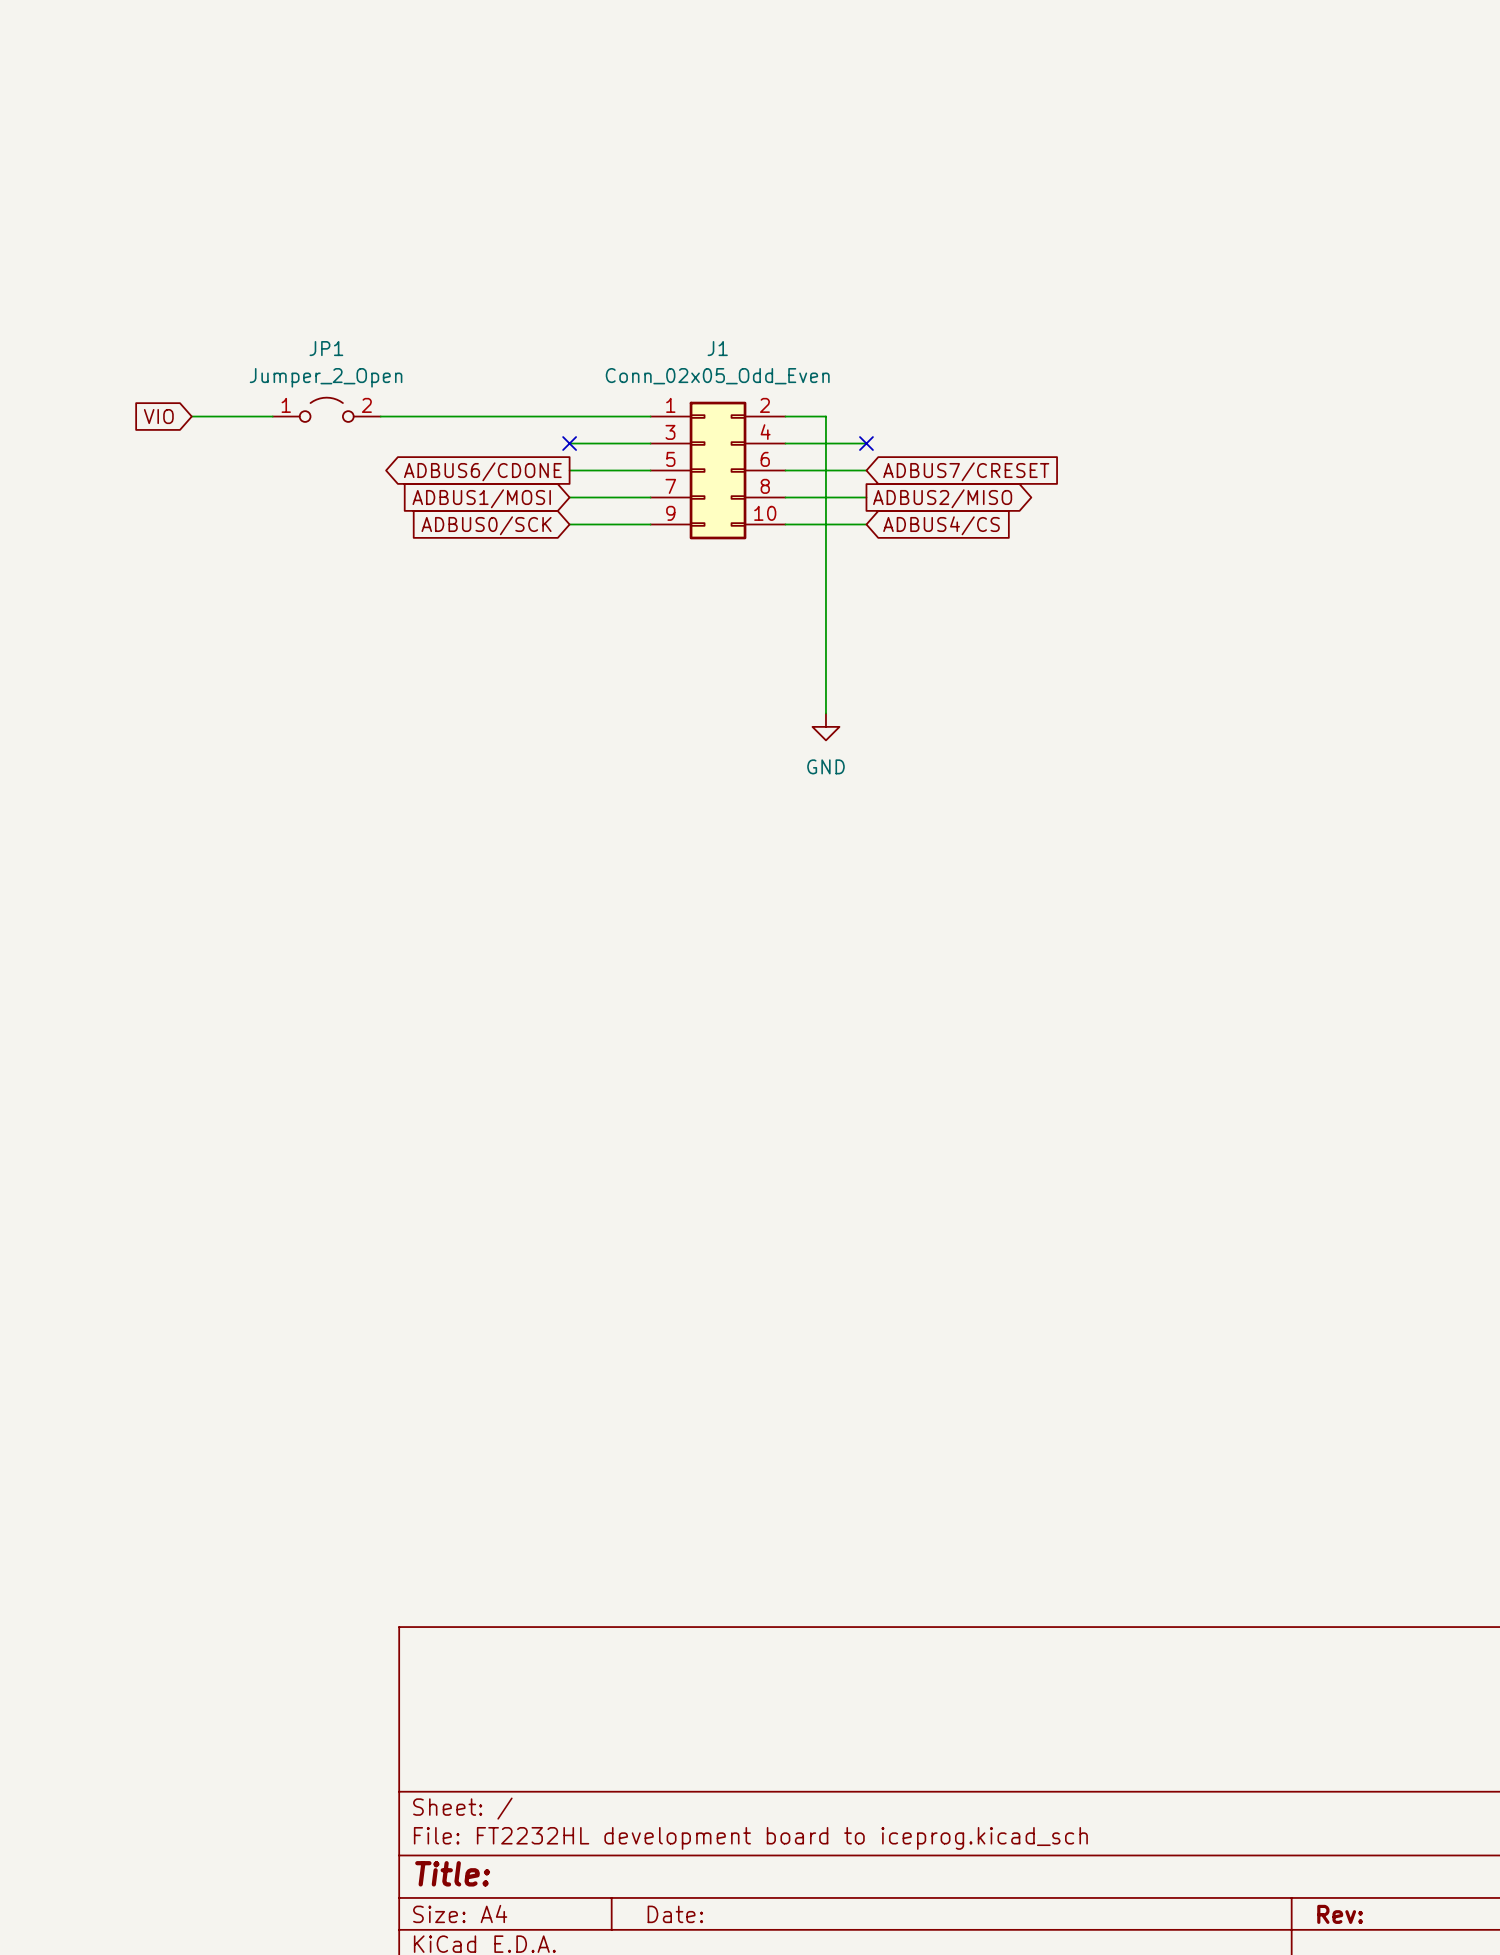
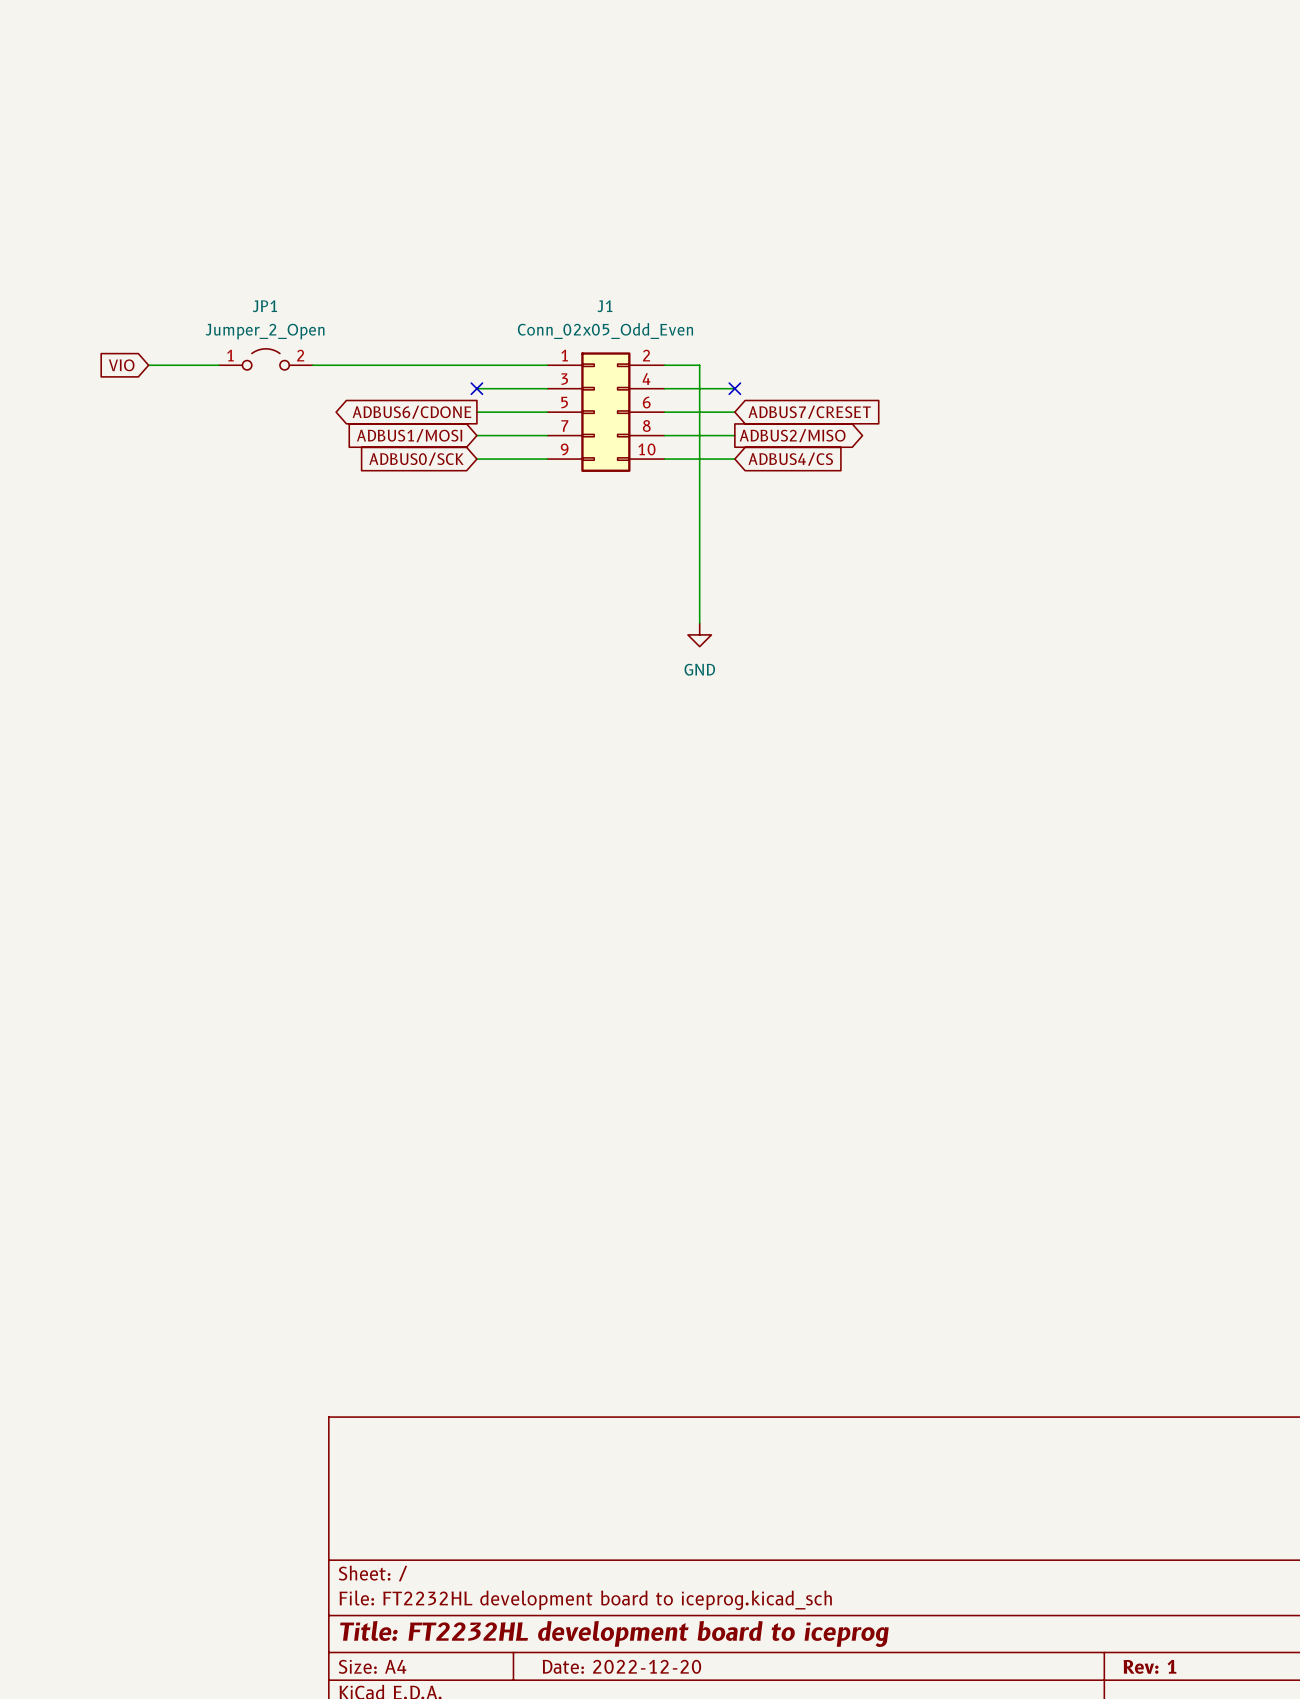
title block: Title: (452, 1873) -> Title: FT2232HL development board to iceprog (614, 1633)
title block: Date: (675, 1914) -> Date: 2022-12-20 (621, 1666)
title block: Rev: (1340, 1914) -> Rev: 1 (1149, 1666)

